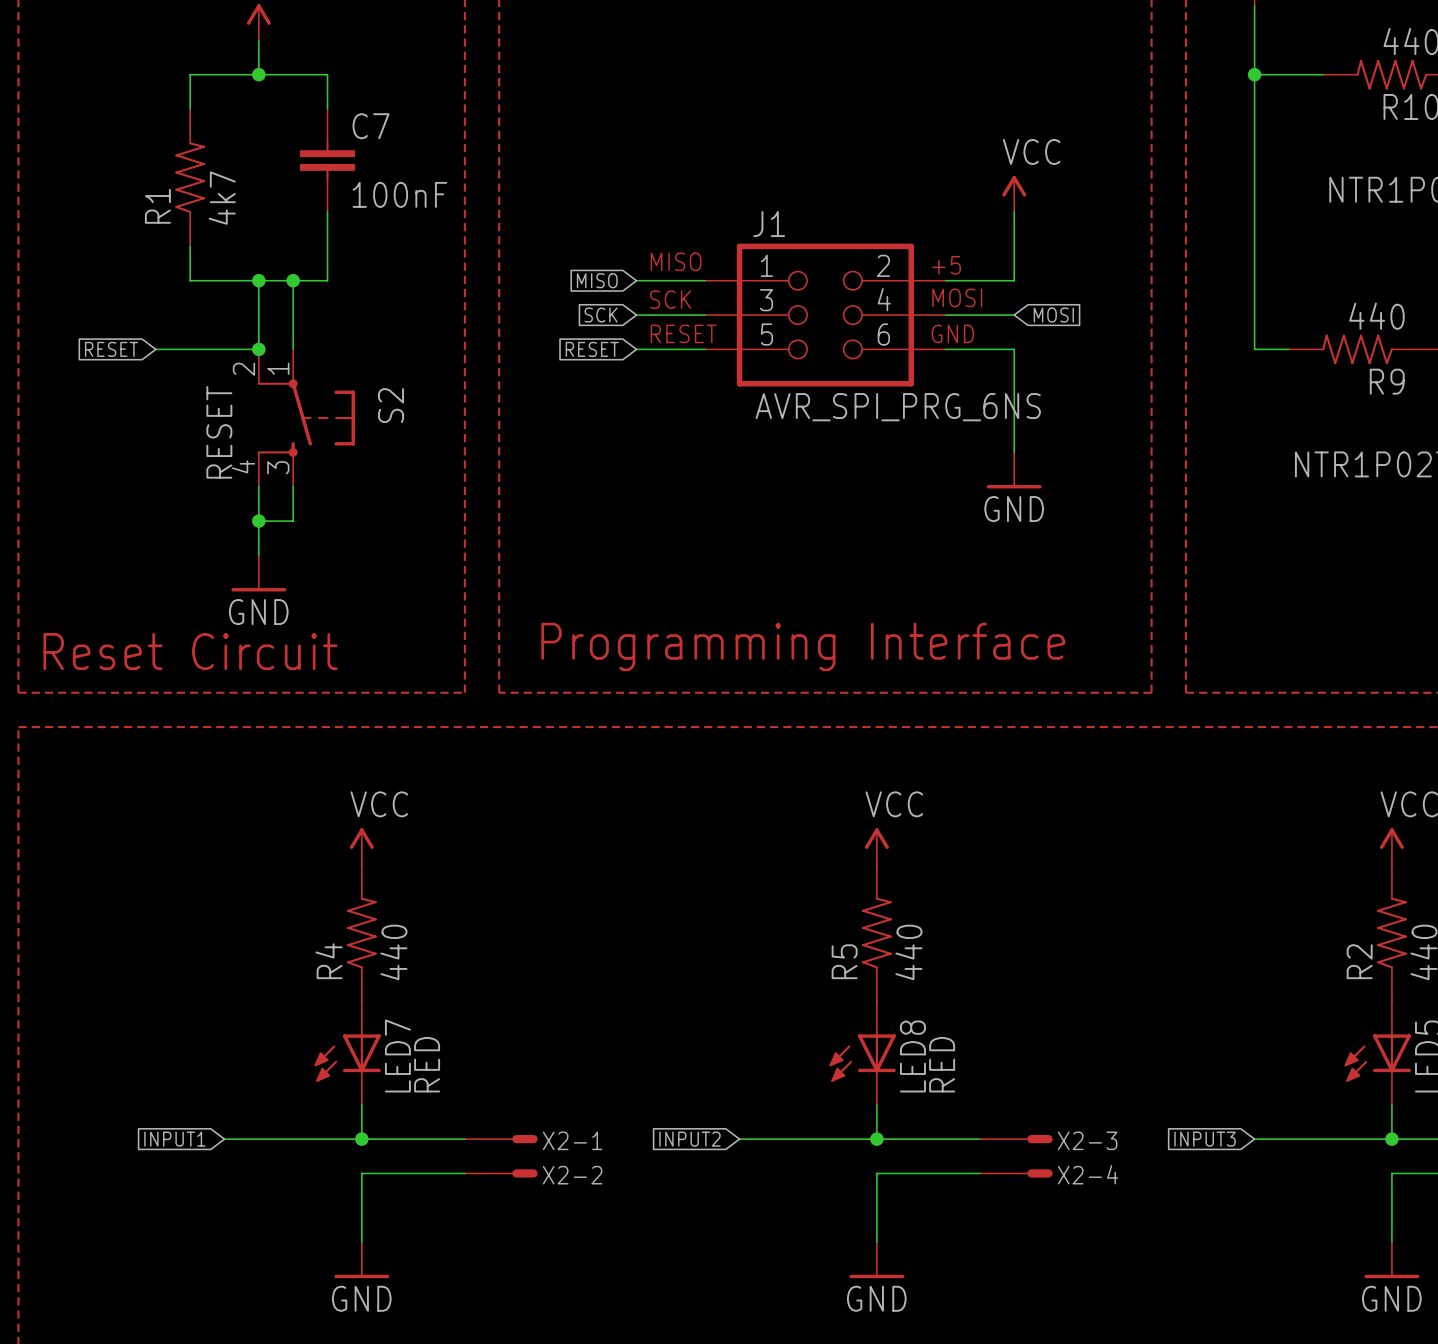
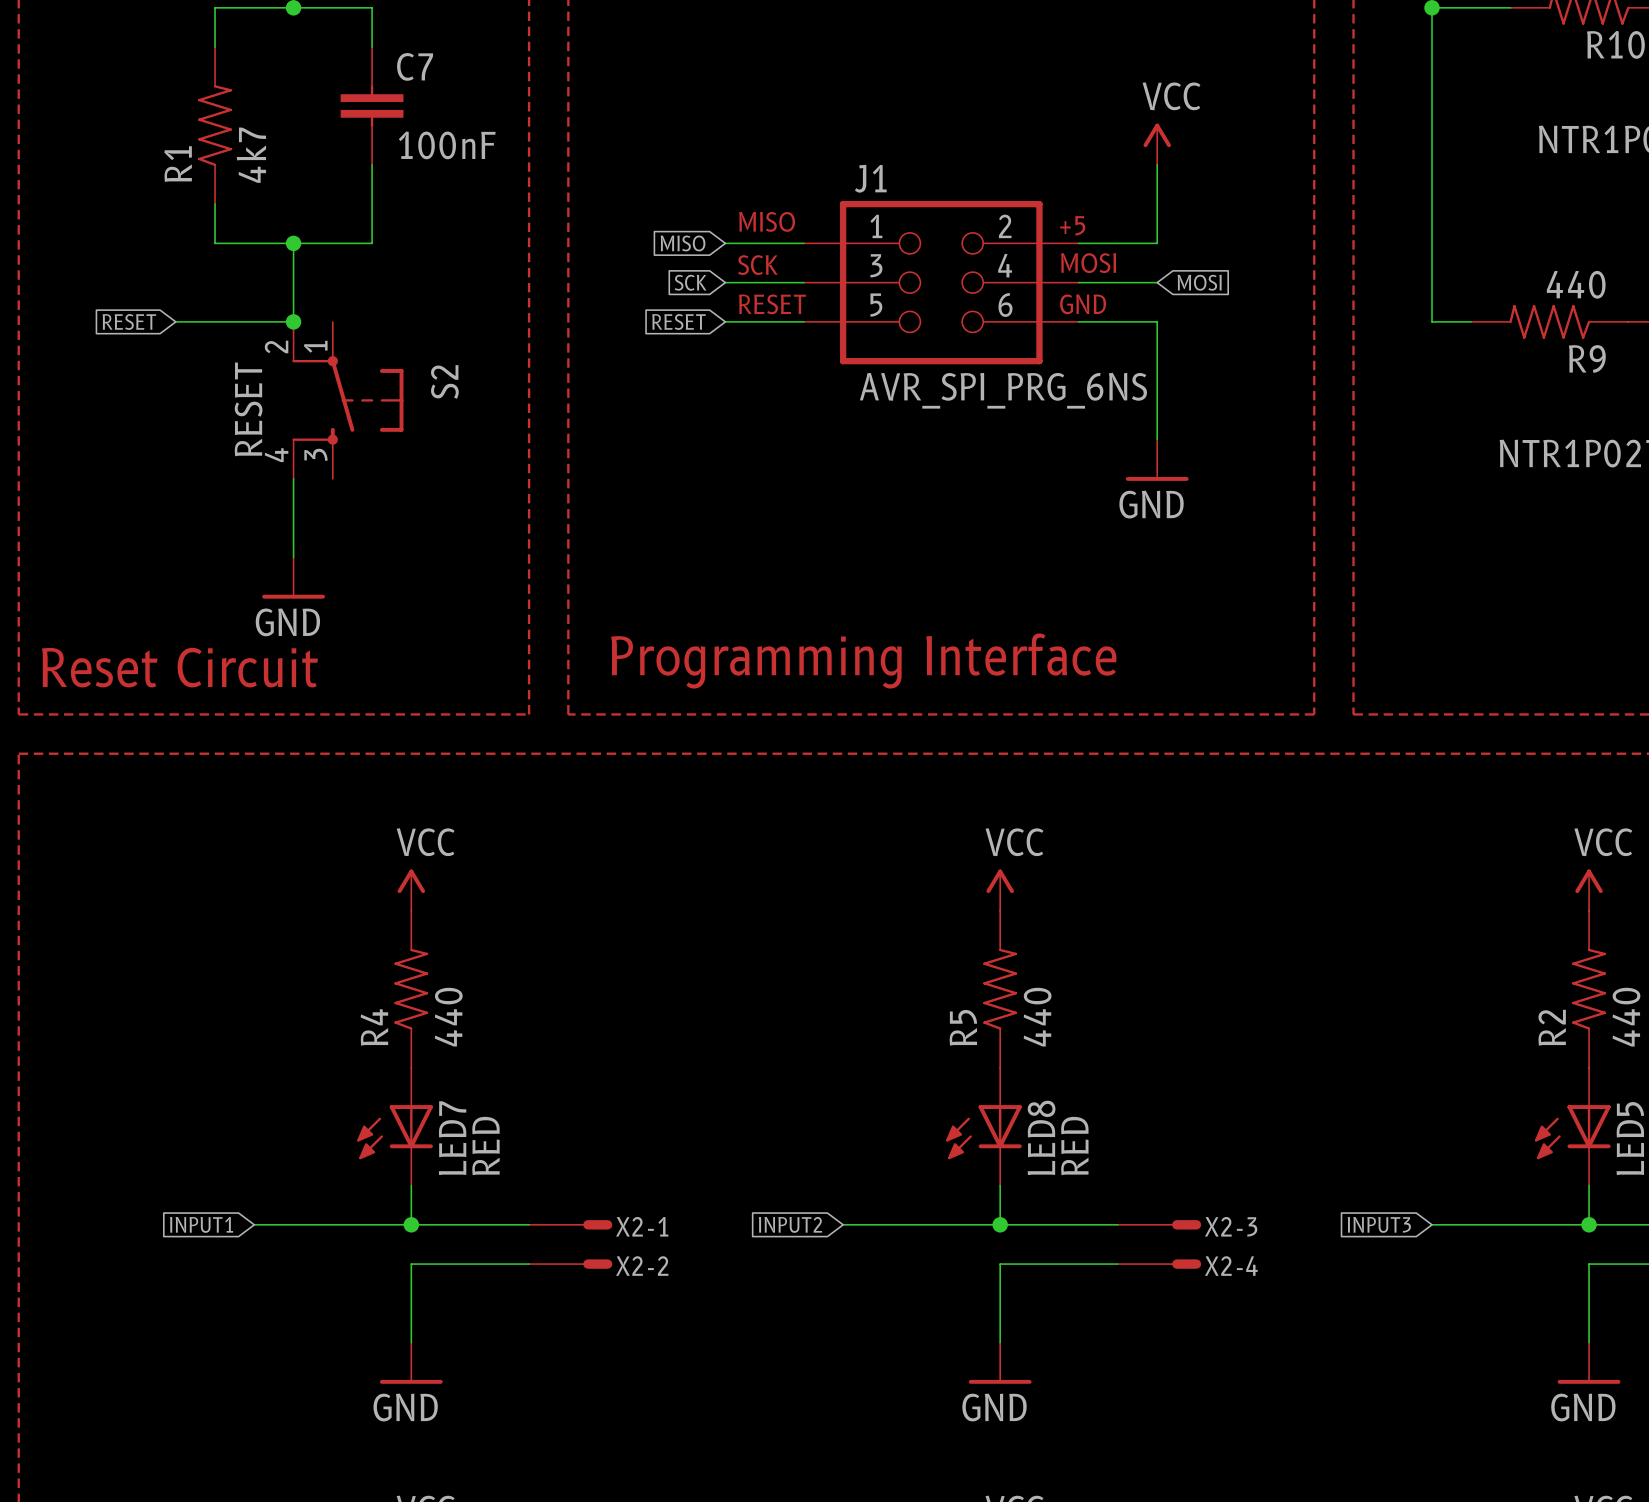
wire: (293, 280) (293, 349) -> none
junction: (293, 280) -> none
wire: (293, 486) (293, 521) (258, 521) -> none
junction: (258, 521) -> none

